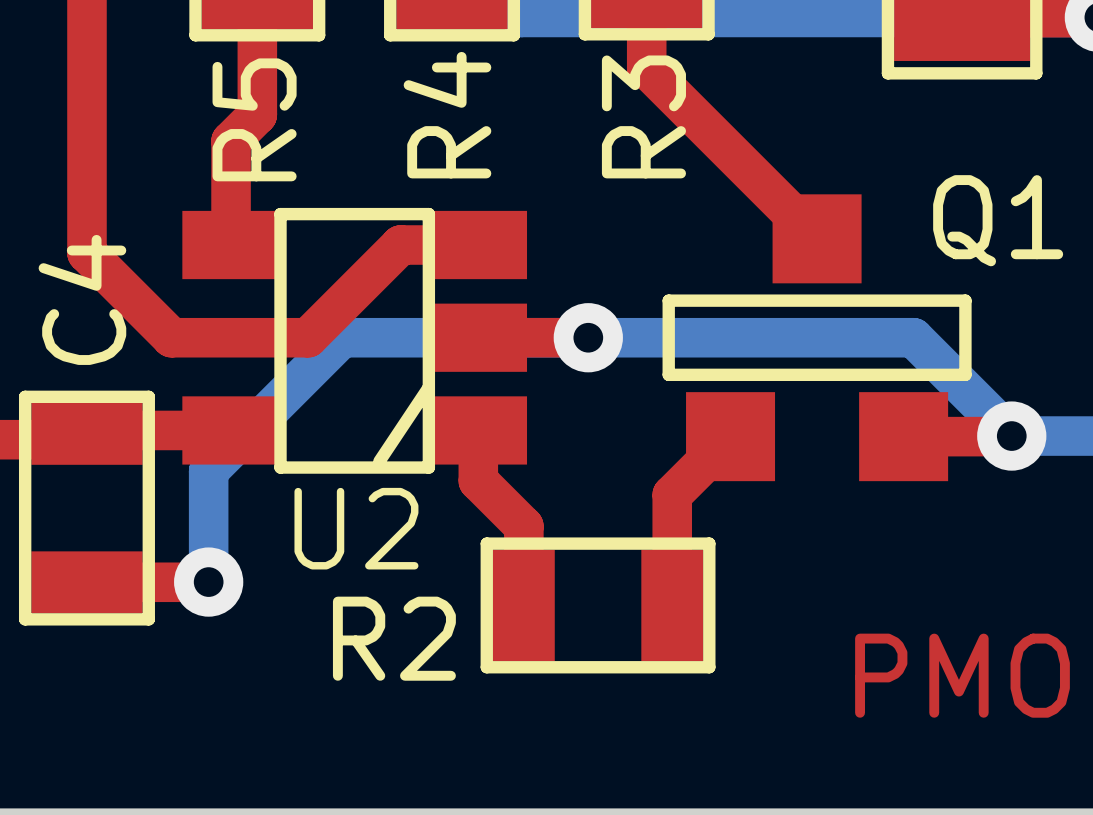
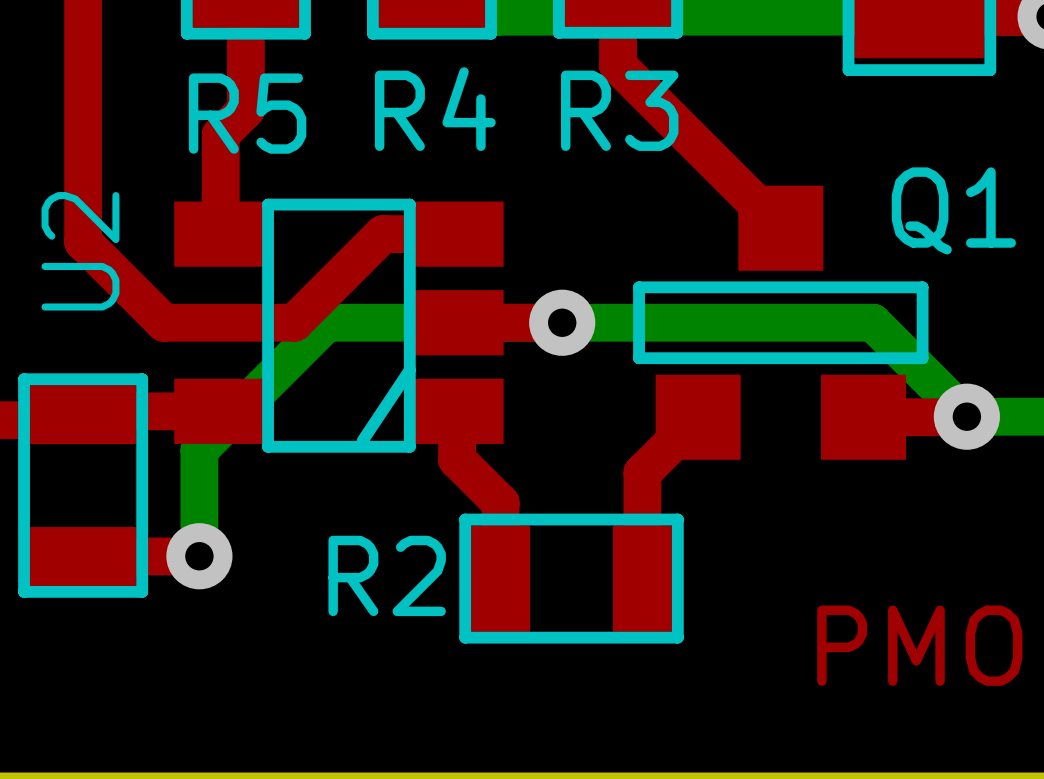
R4 name rotation: 0° (447, 115) -> 90° clockwise (435, 109)
R3 name rotation: 0° (643, 116) -> 90° clockwise (619, 110)
R5 name rotation: 0° (254, 119) -> 90° clockwise (247, 113)
C4 name: C4 (82, 299) -> none
U2 name rotation: 0° (356, 528) -> 90° counterclockwise (80, 251)
U2 name position: U2 (356, 528) -> U2 (80, 251)
R2 name position: R2 (394, 638) -> R2 (387, 575)

